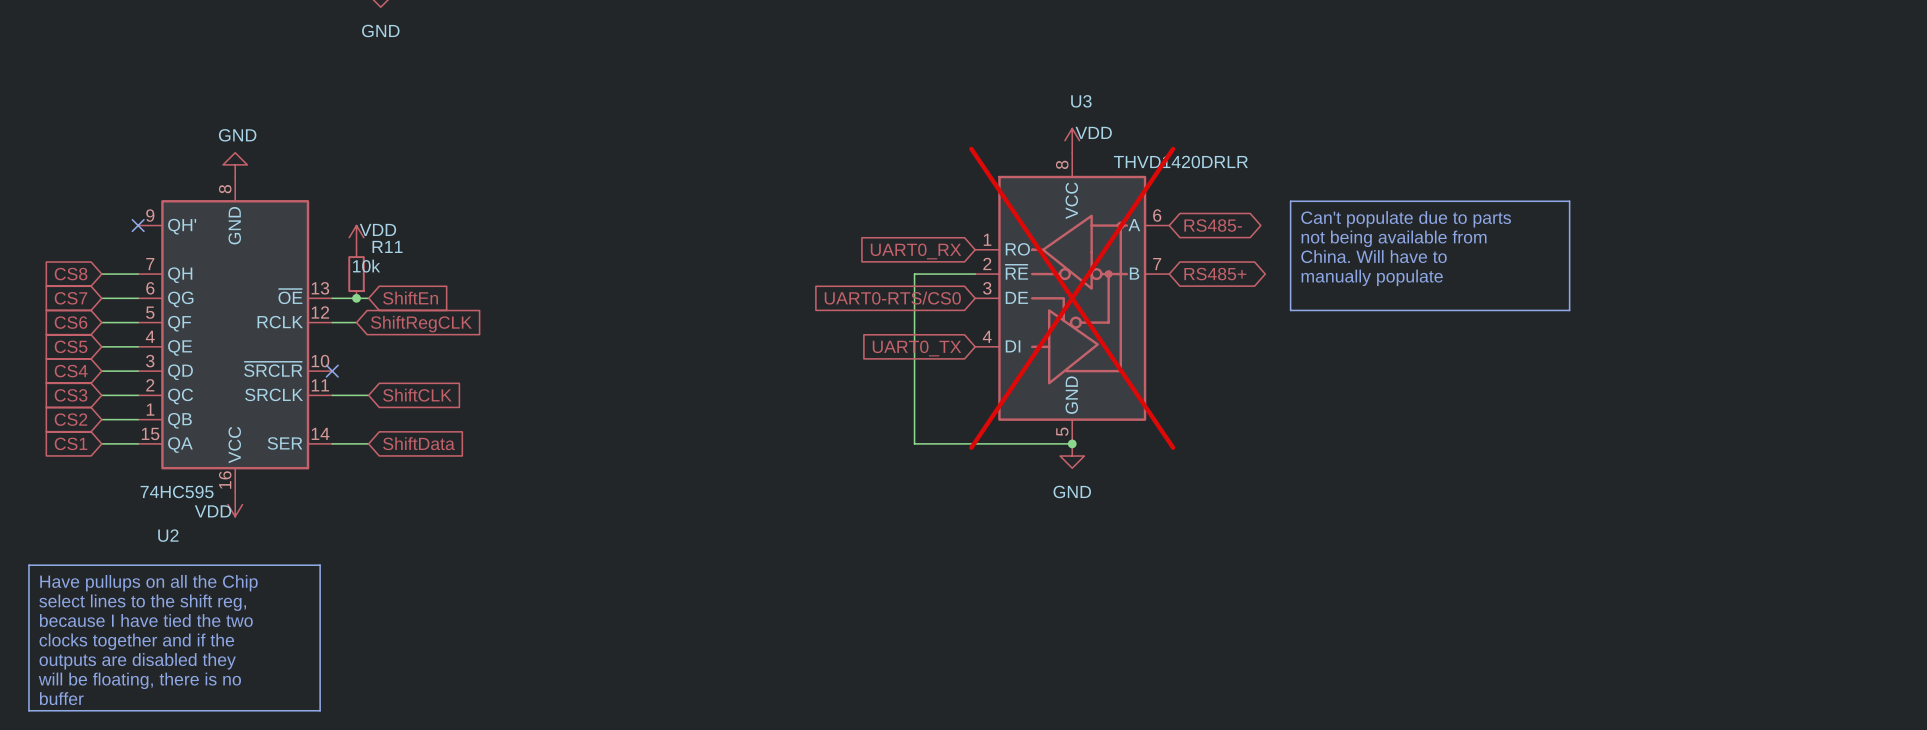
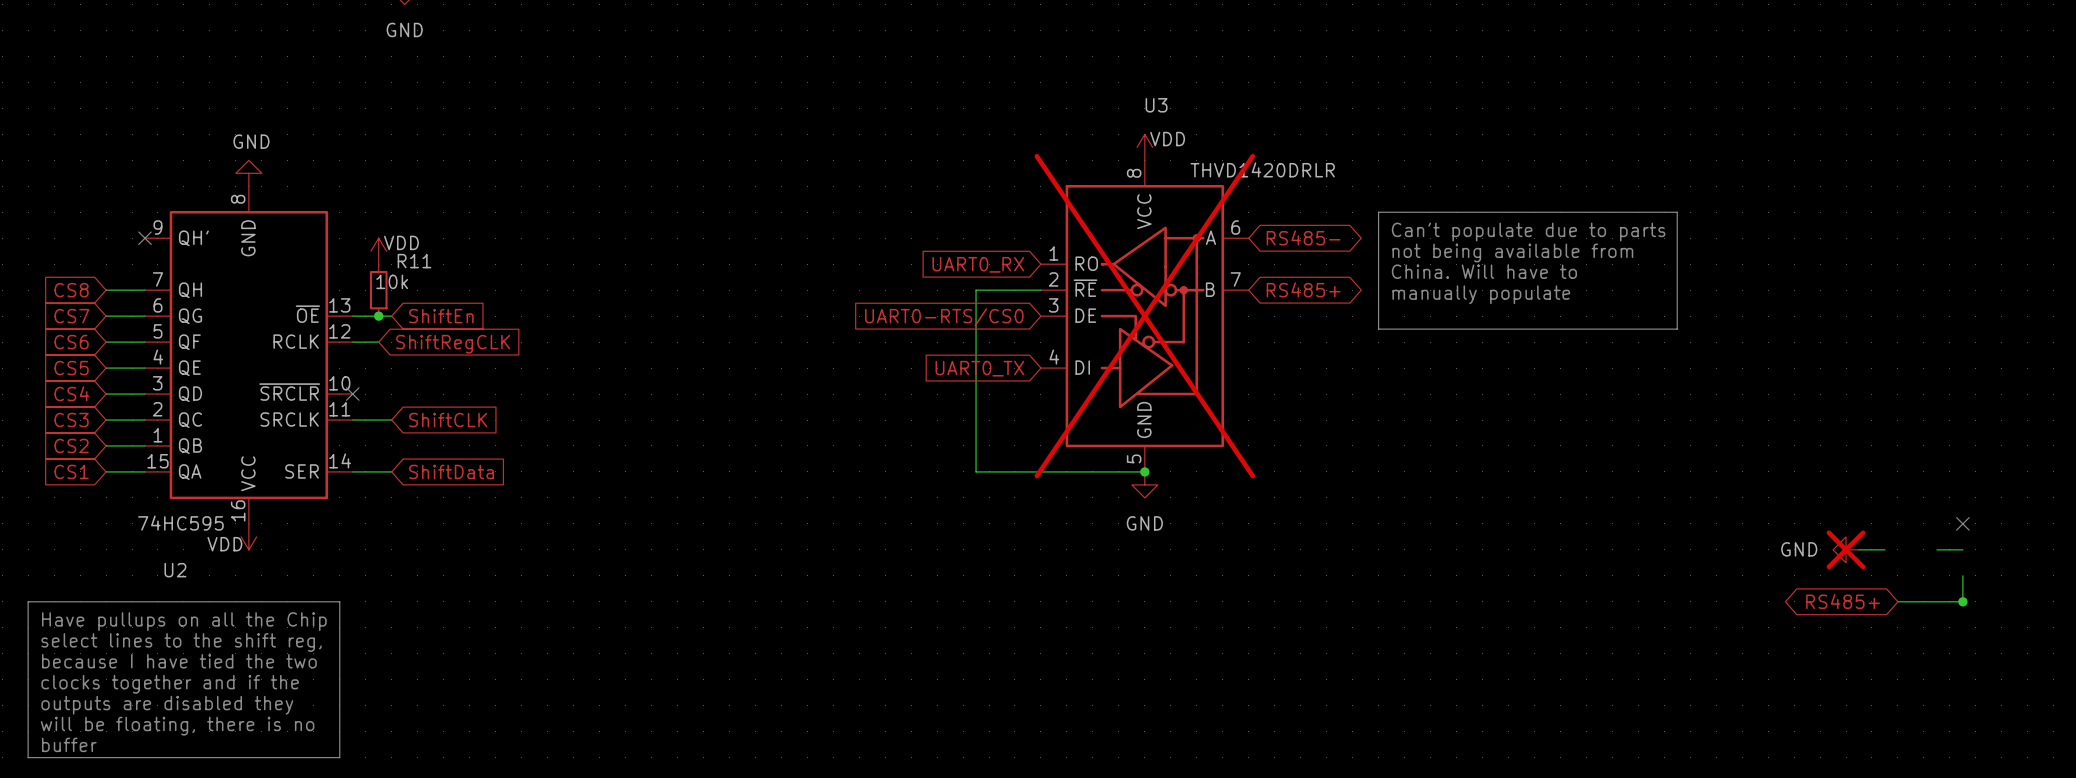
no-connect mark: none -> (1962, 523)
power symbol: none -> GND (1846, 549)
wire: none -> (1859, 549) (1884, 549)
wire: none -> (1936, 549) (1962, 549)
wire: none -> (1962, 575) (1962, 601) (1897, 601)
global label: none -> RS485+ (1843, 601)
junction: none -> (1962, 601)

